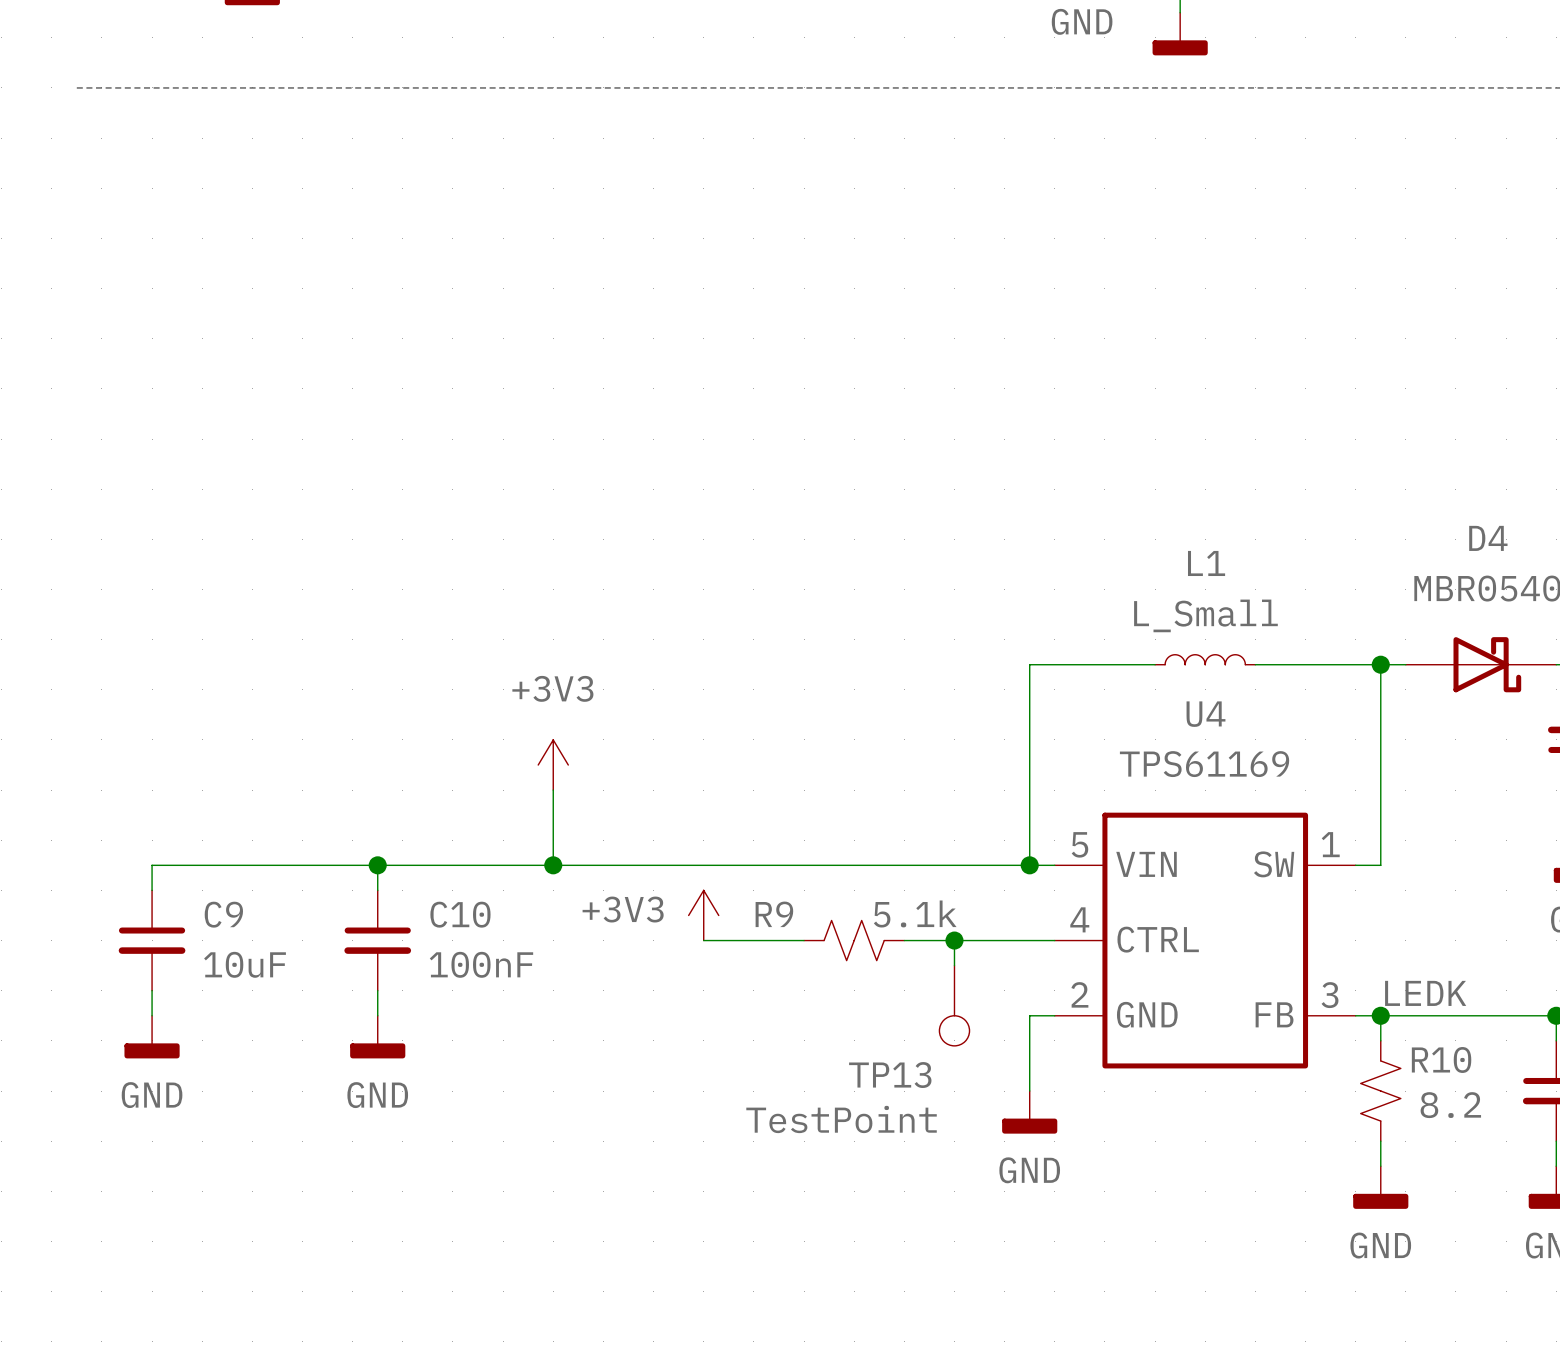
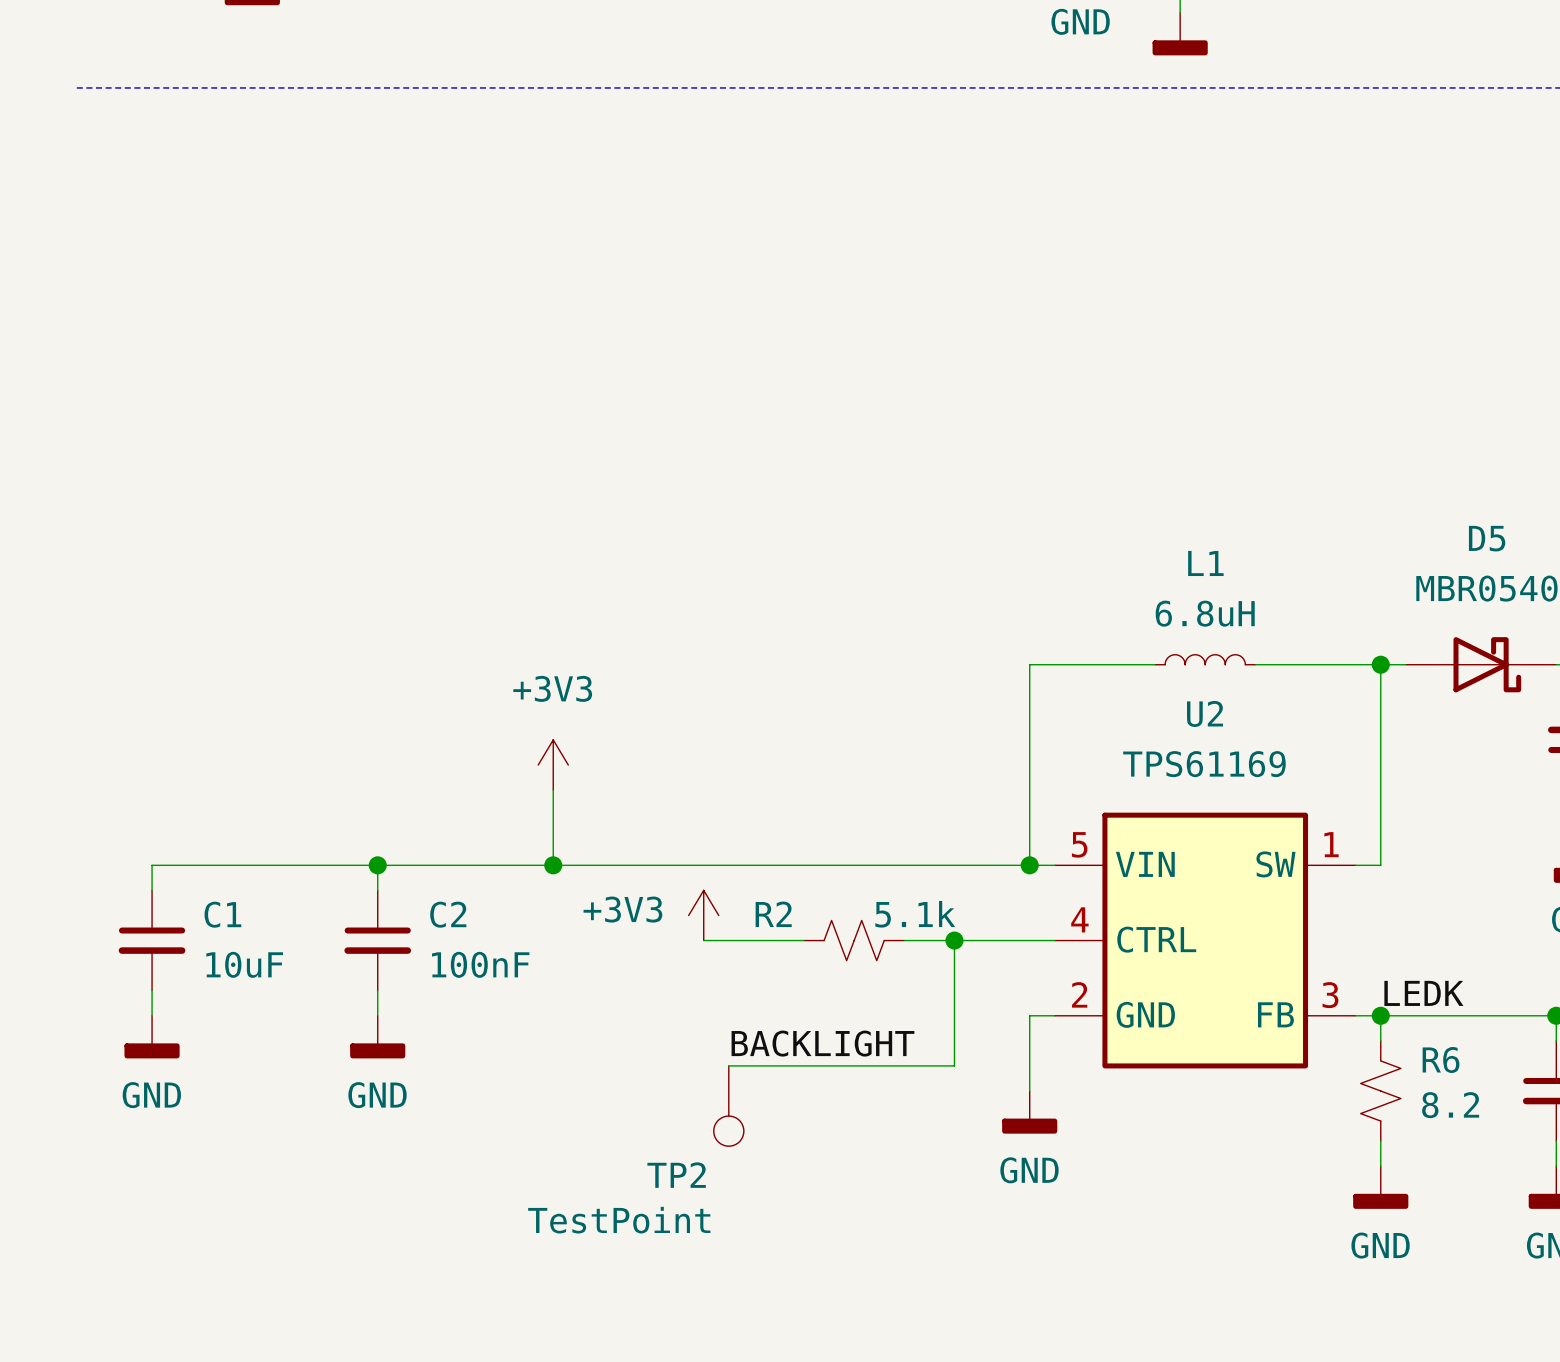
D4 name: D4 (1488, 538) -> D5 (1487, 538)
L1 value: L_Small (1205, 615) -> 6.8uH (1205, 613)
U4 name: U4 (1205, 714) -> U2 (1205, 713)
C9 name: C9 (223, 914) -> C1 (222, 914)
C10 name: C10 (460, 914) -> C2 (448, 914)
R9 name: R9 (774, 914) -> R2 (773, 914)
wire: none -> (954, 965) (954, 1065) (728, 1065)
TP13: TestPoint (954, 1005) -> none
label: none -> BACKLIGHT (822, 1043)
R10 name: R10 (1441, 1059) -> R6 (1441, 1060)
TP2: none -> TestPoint (728, 1106)

